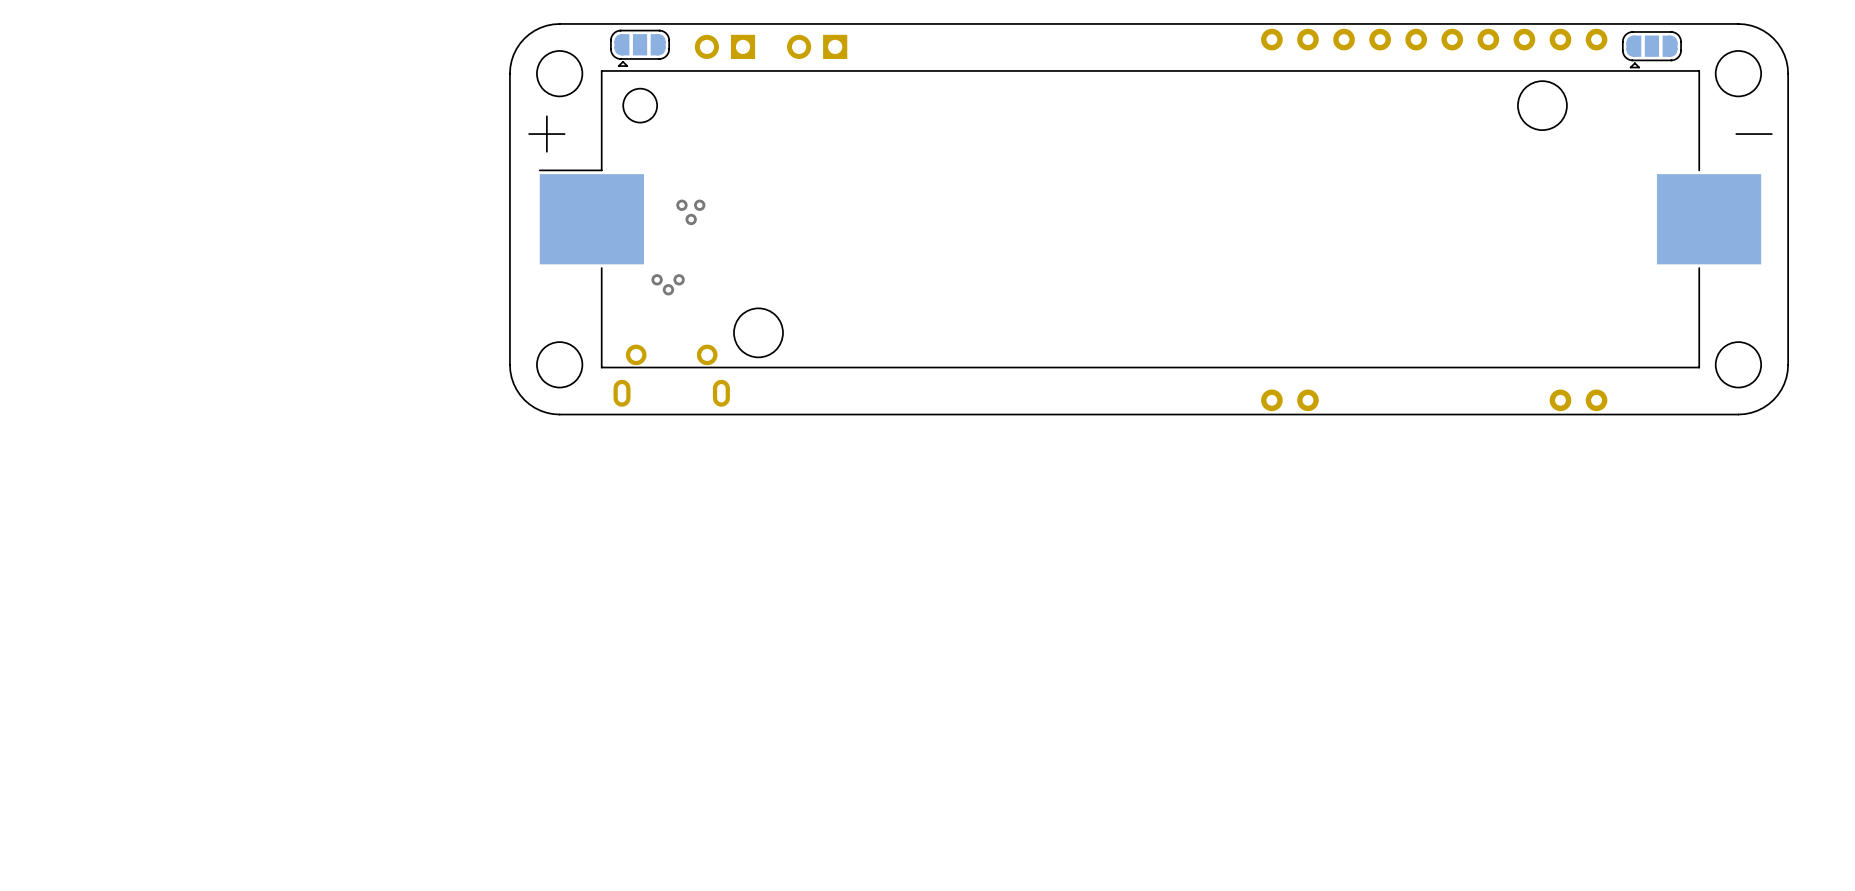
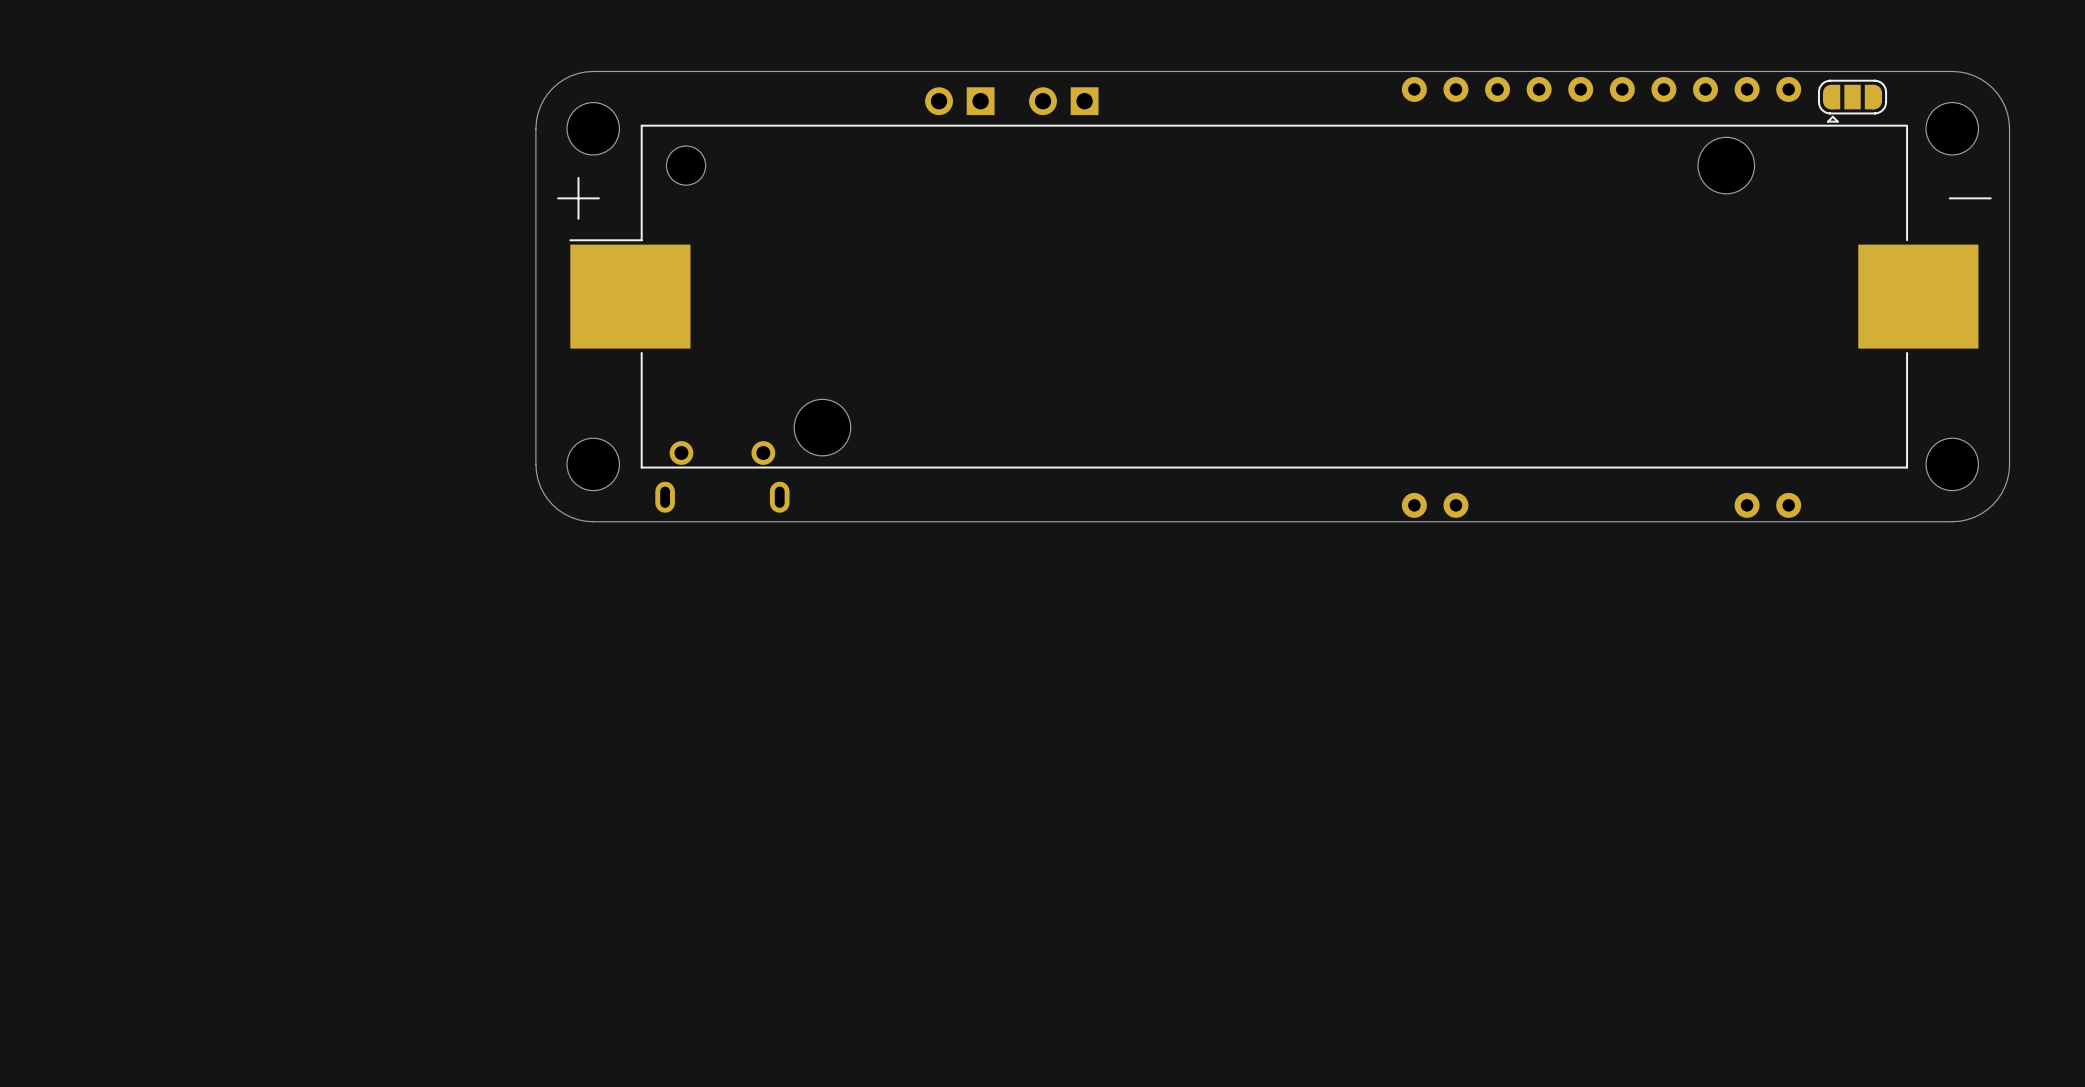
part: (724, 46) -> none
part position: (817, 46) -> (959, 101)
part: (640, 48) -> none
part: none -> (1063, 101)
via: (681, 205) -> none
via: (699, 205) -> none
via: (691, 219) -> none
via: (657, 279) -> none
via: (679, 279) -> none
via: (668, 289) -> none

